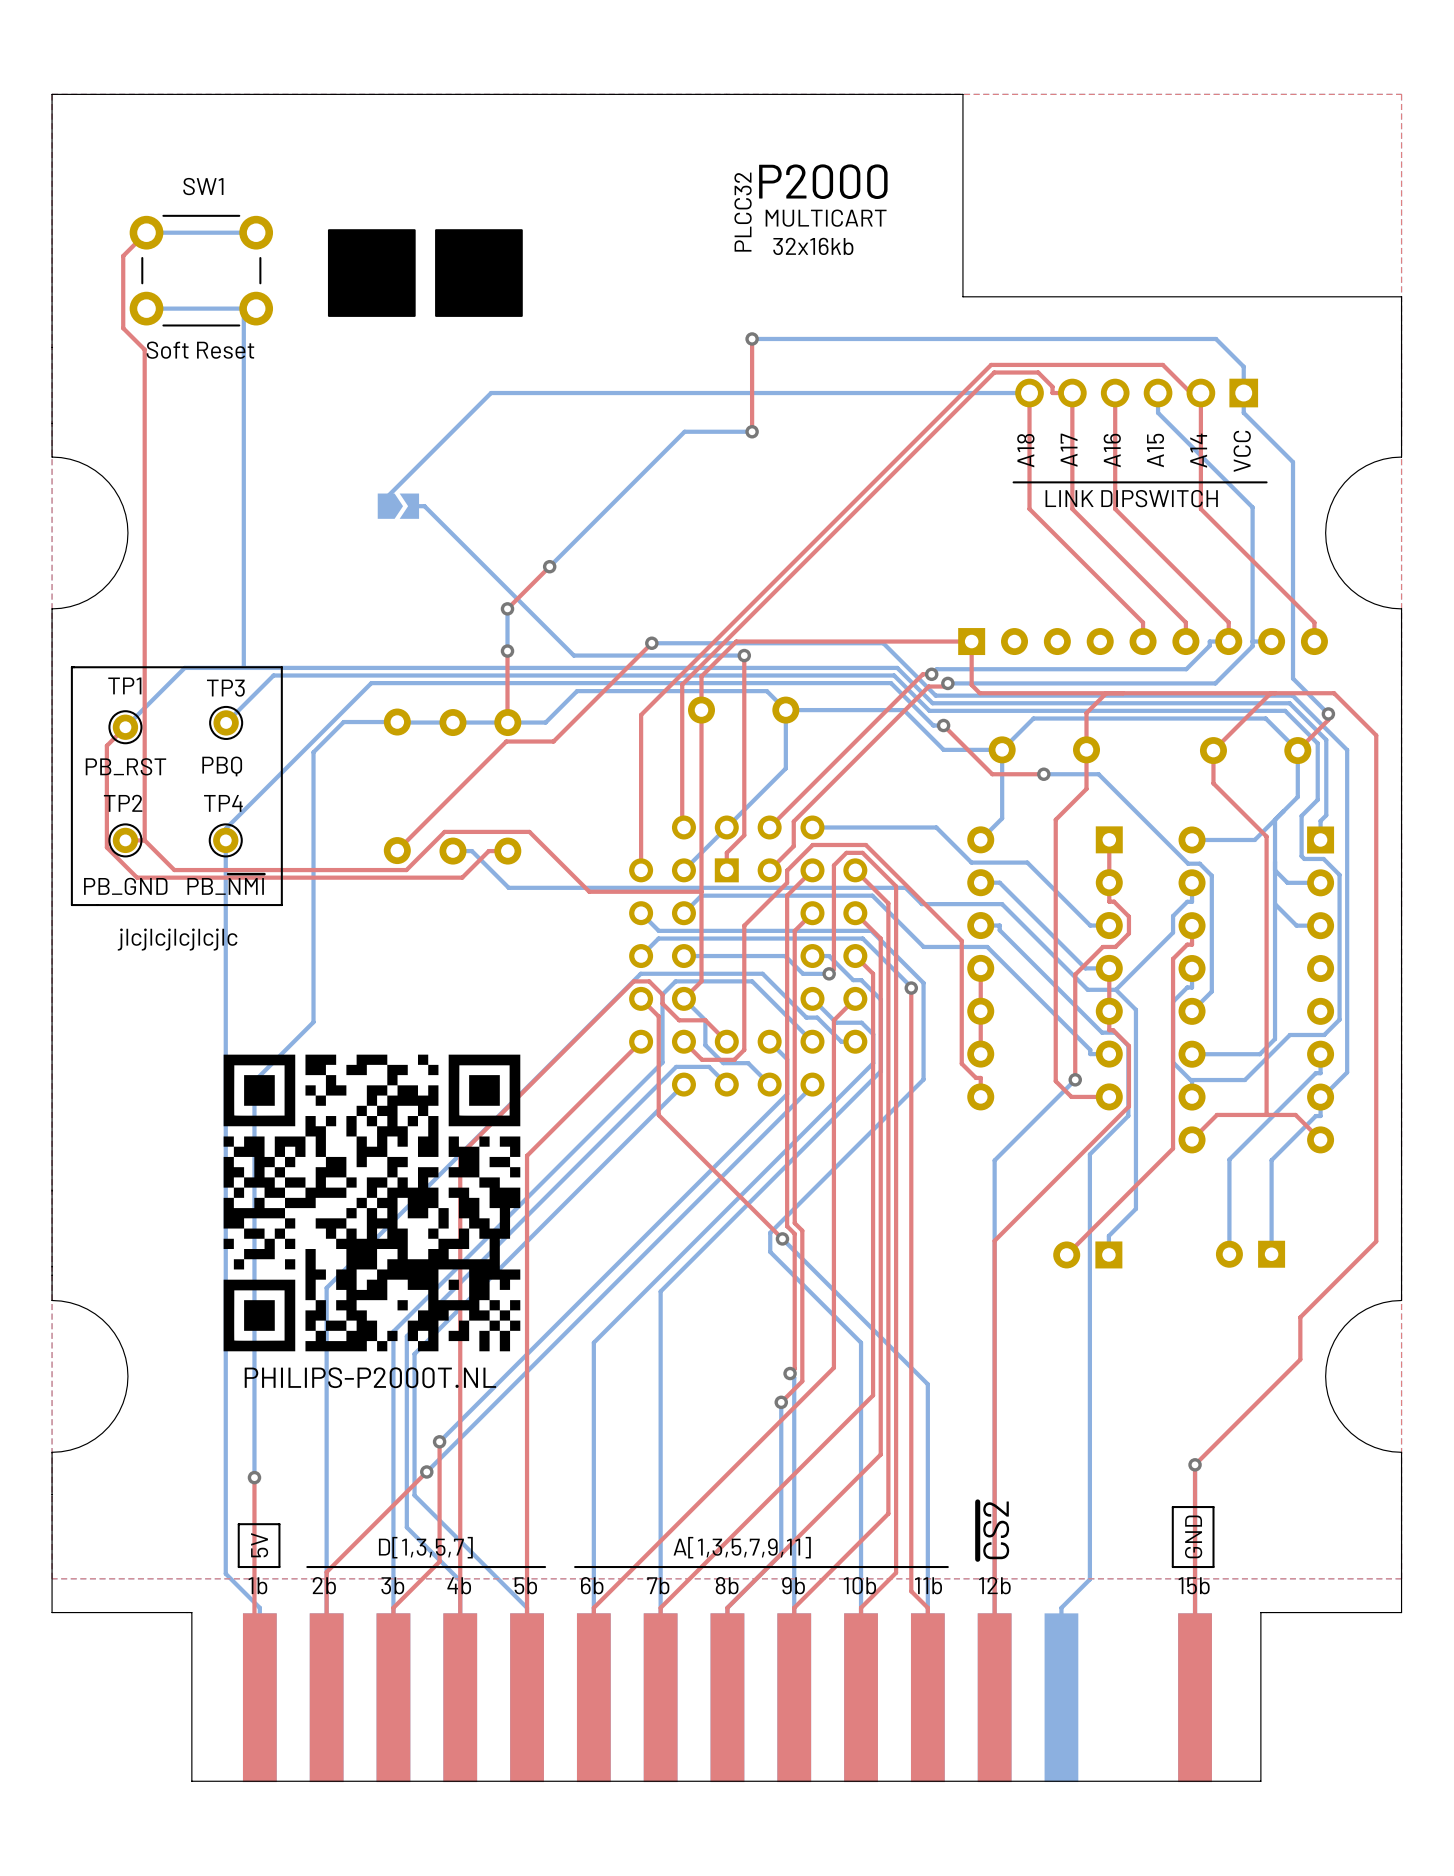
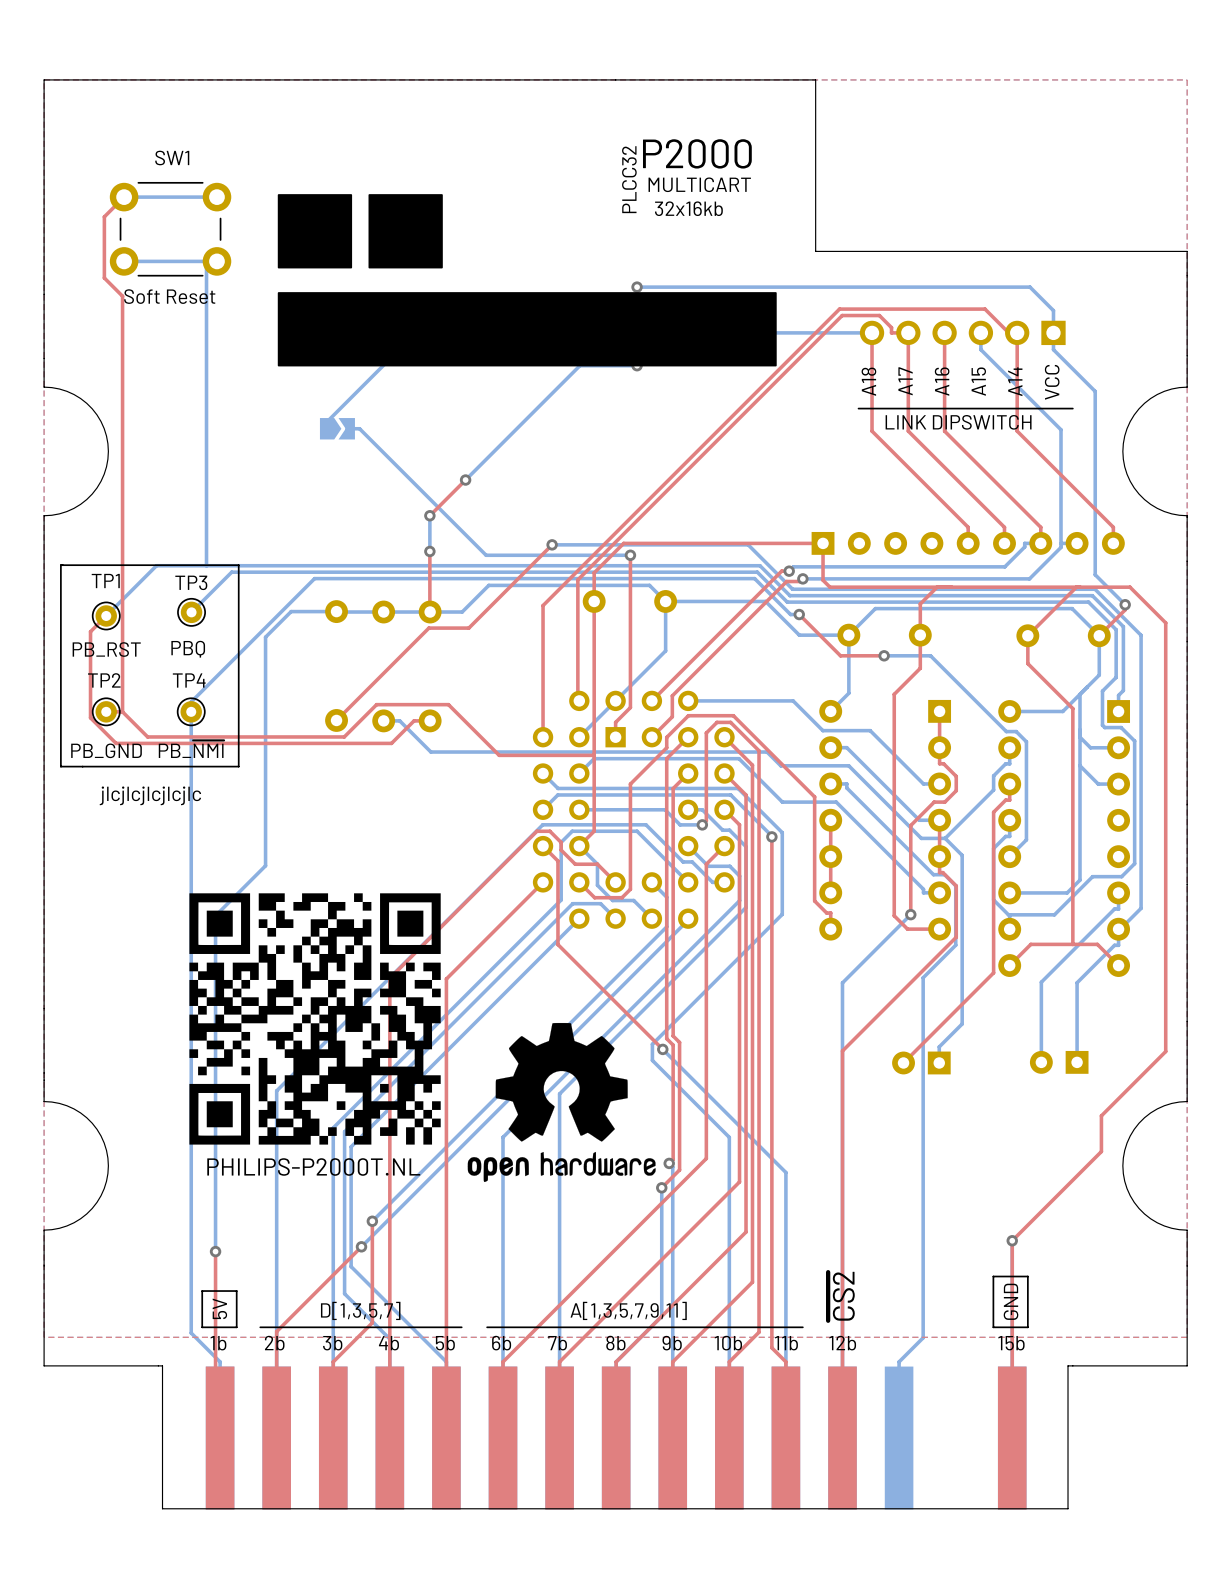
drawing: none -> [277, 292, 777, 367]
drawing: none -> [467, 1022, 656, 1183]

